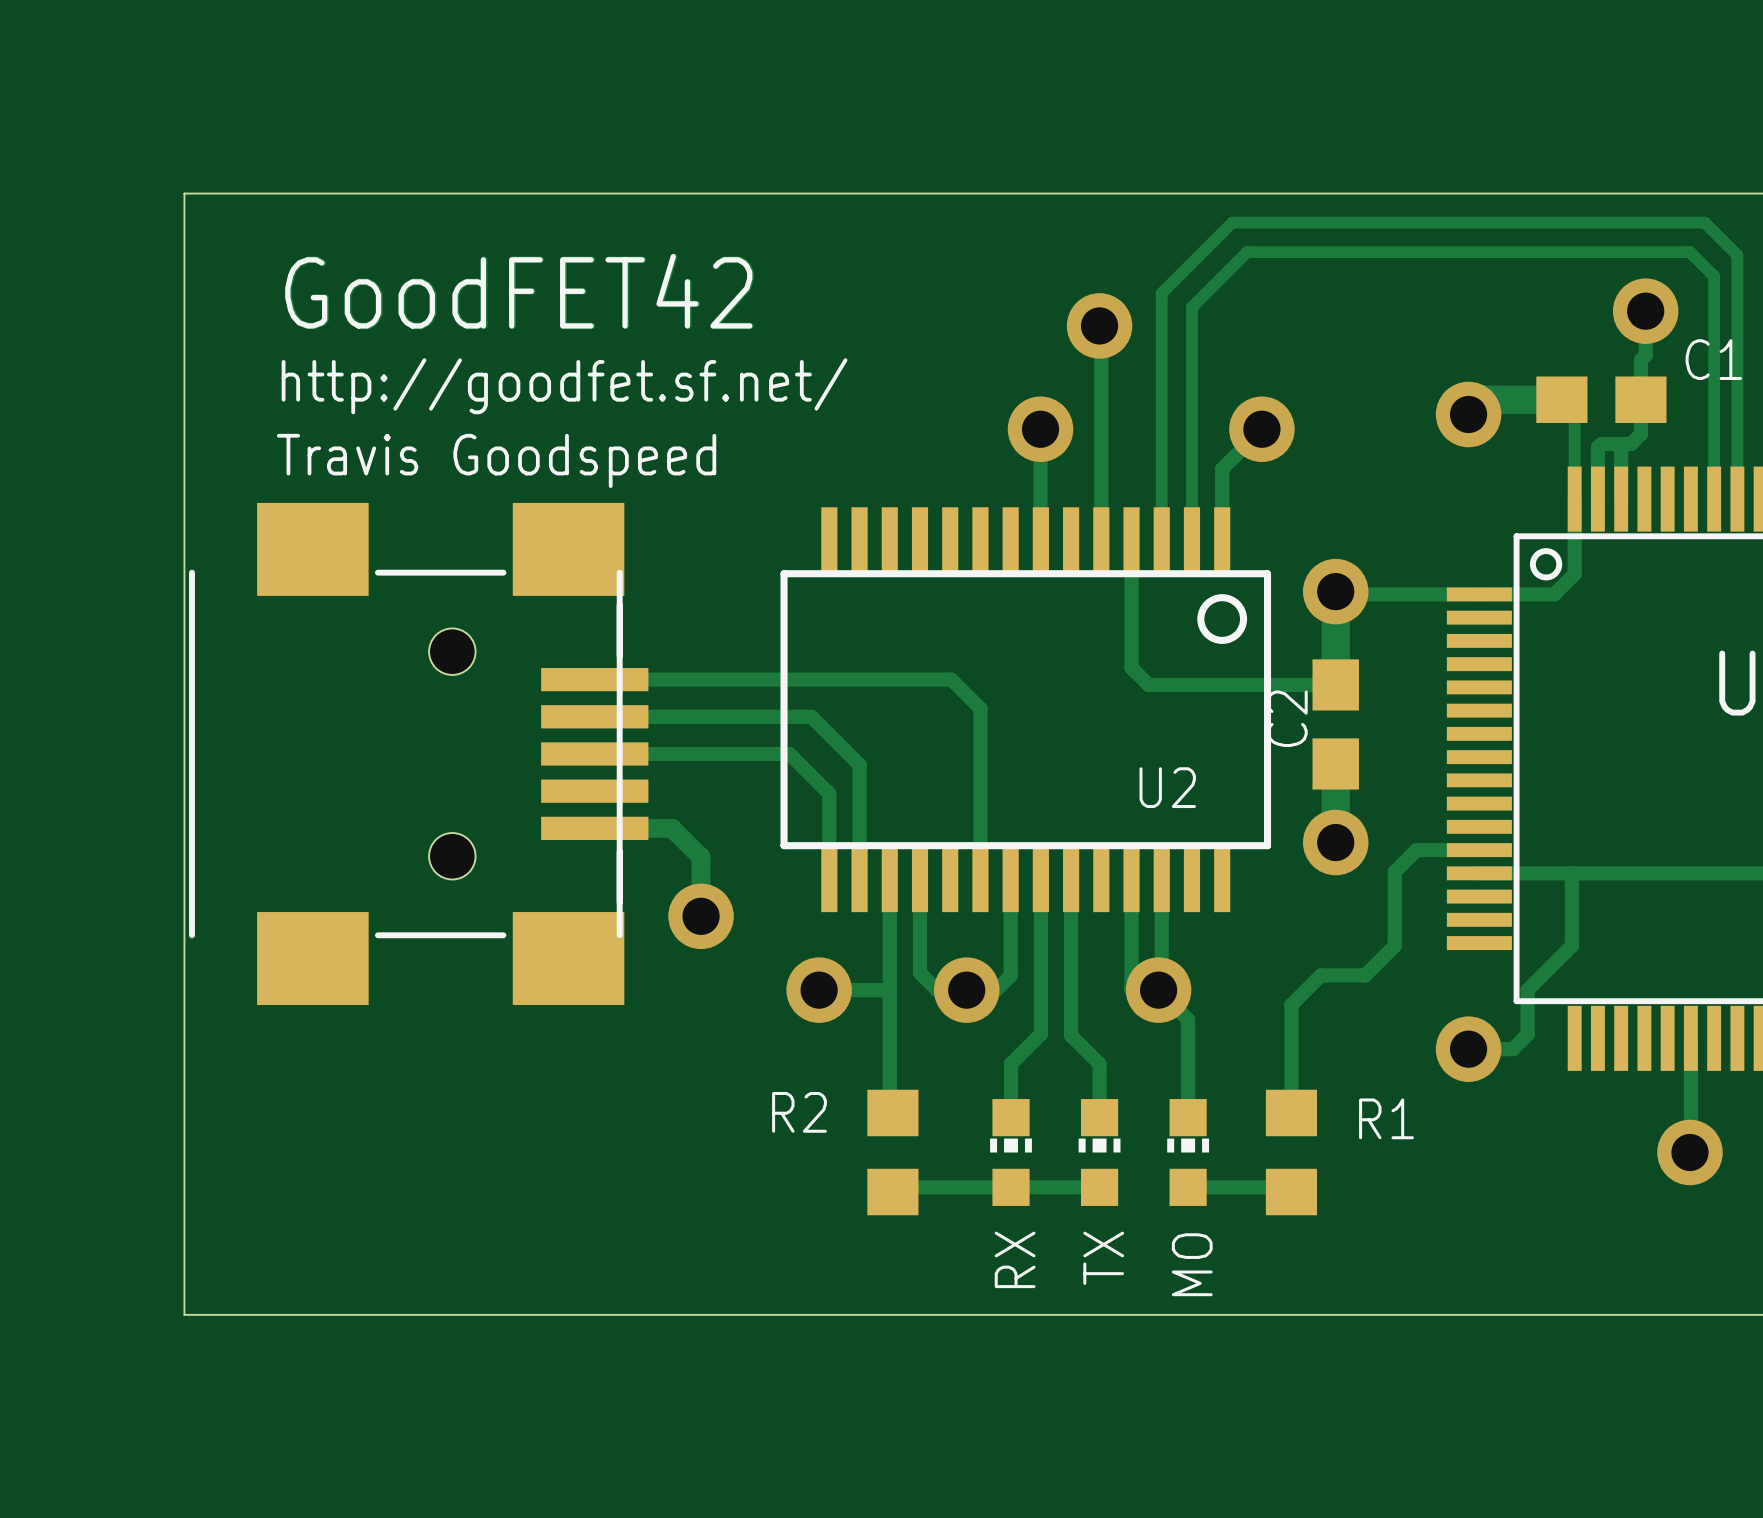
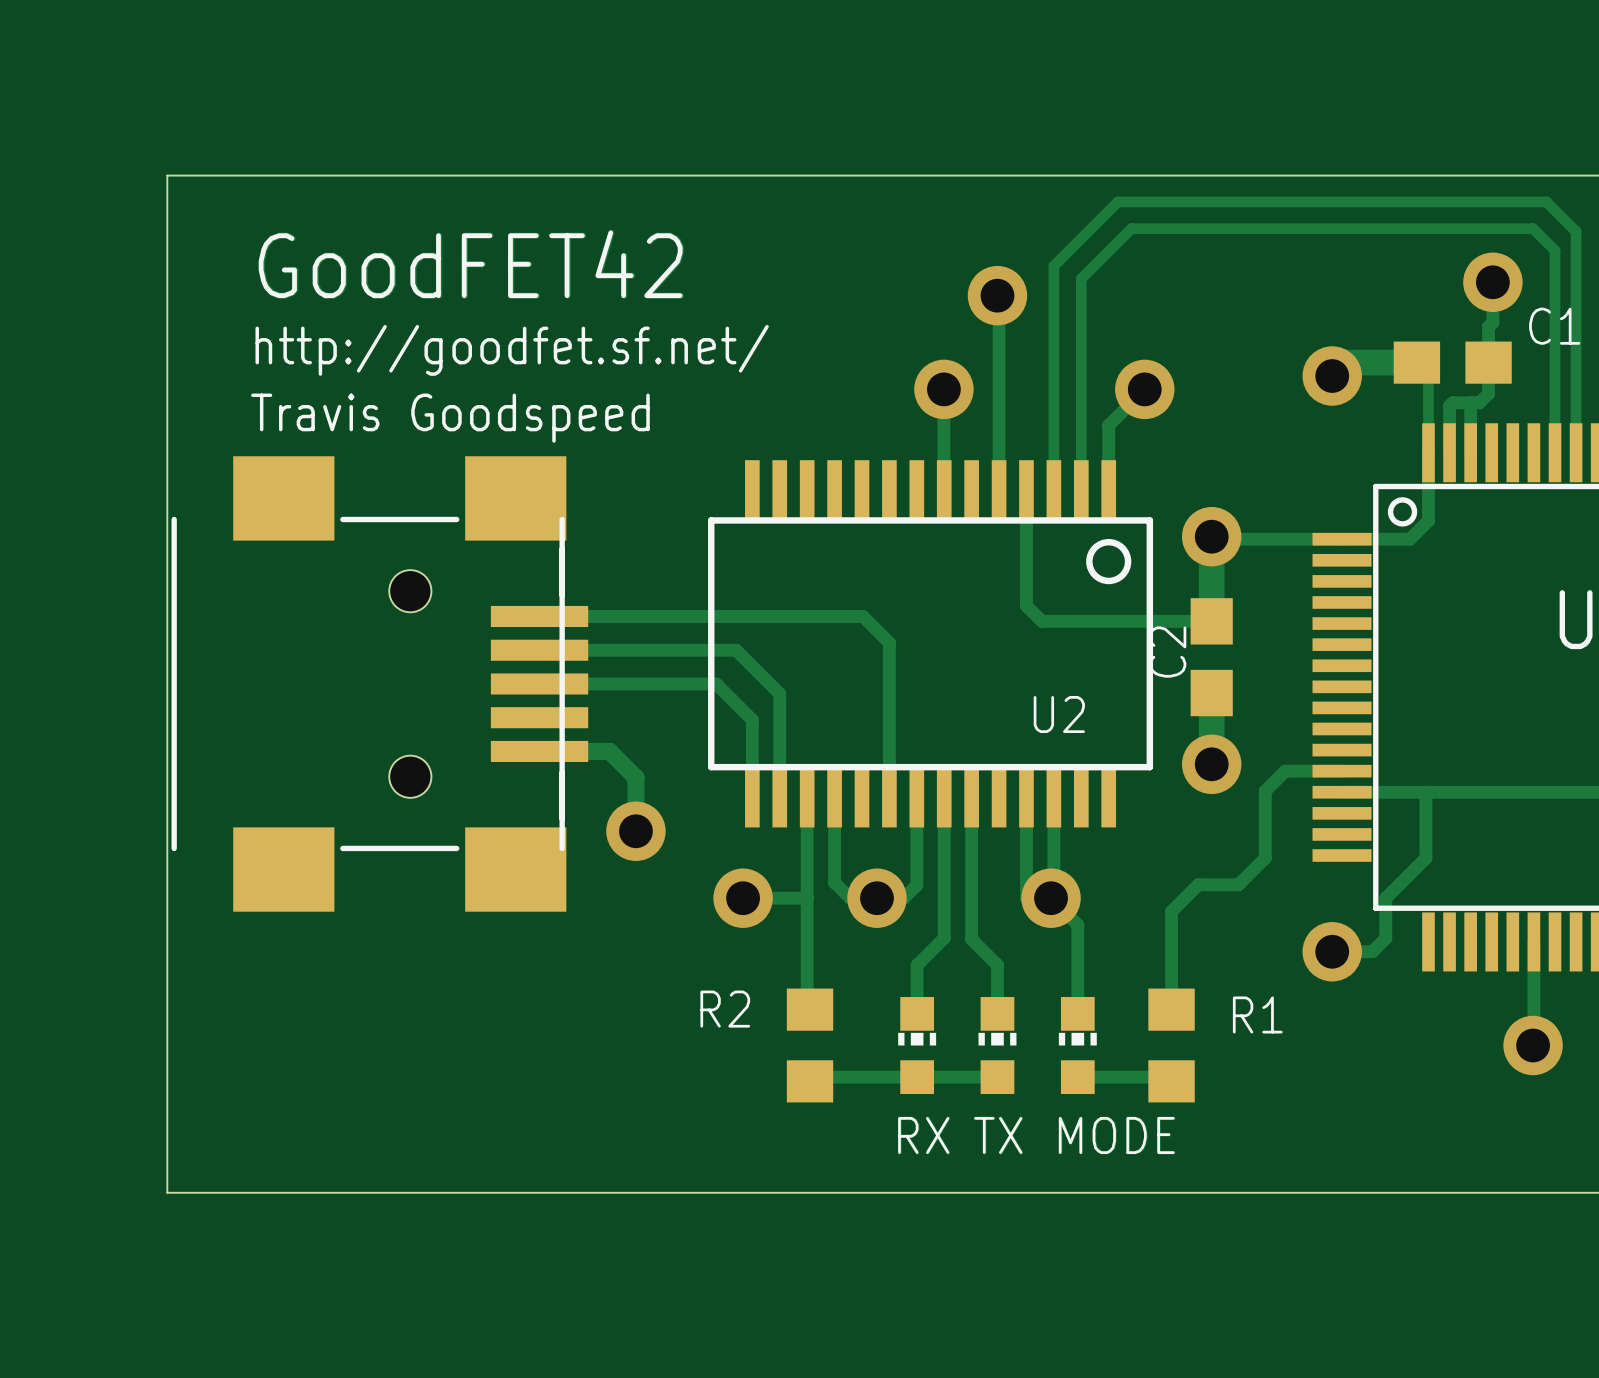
TX name rotation: 0° (1103, 1258) -> 90° clockwise (998, 1135)
RX name rotation: 0° (1015, 1259) -> 90° clockwise (923, 1135)
MO name: MO (1192, 1264) -> MODE (1116, 1135)

